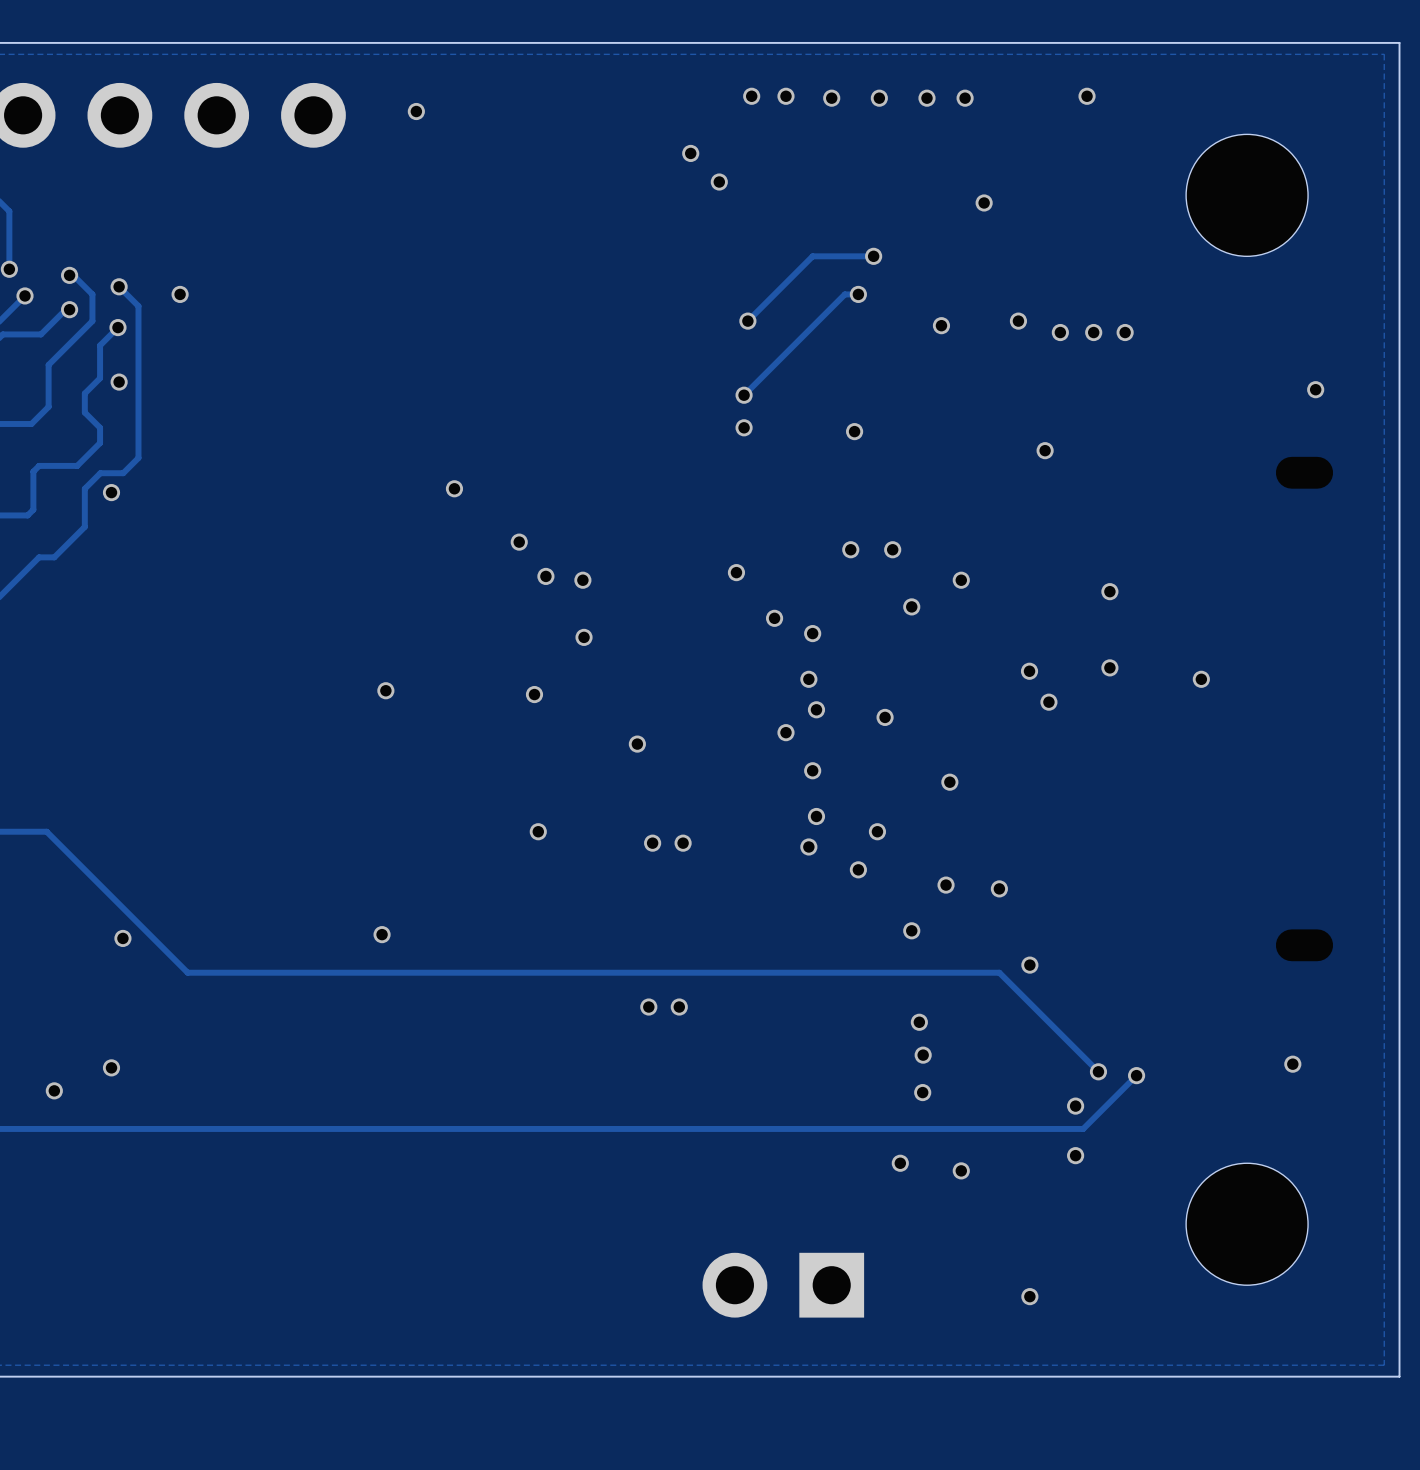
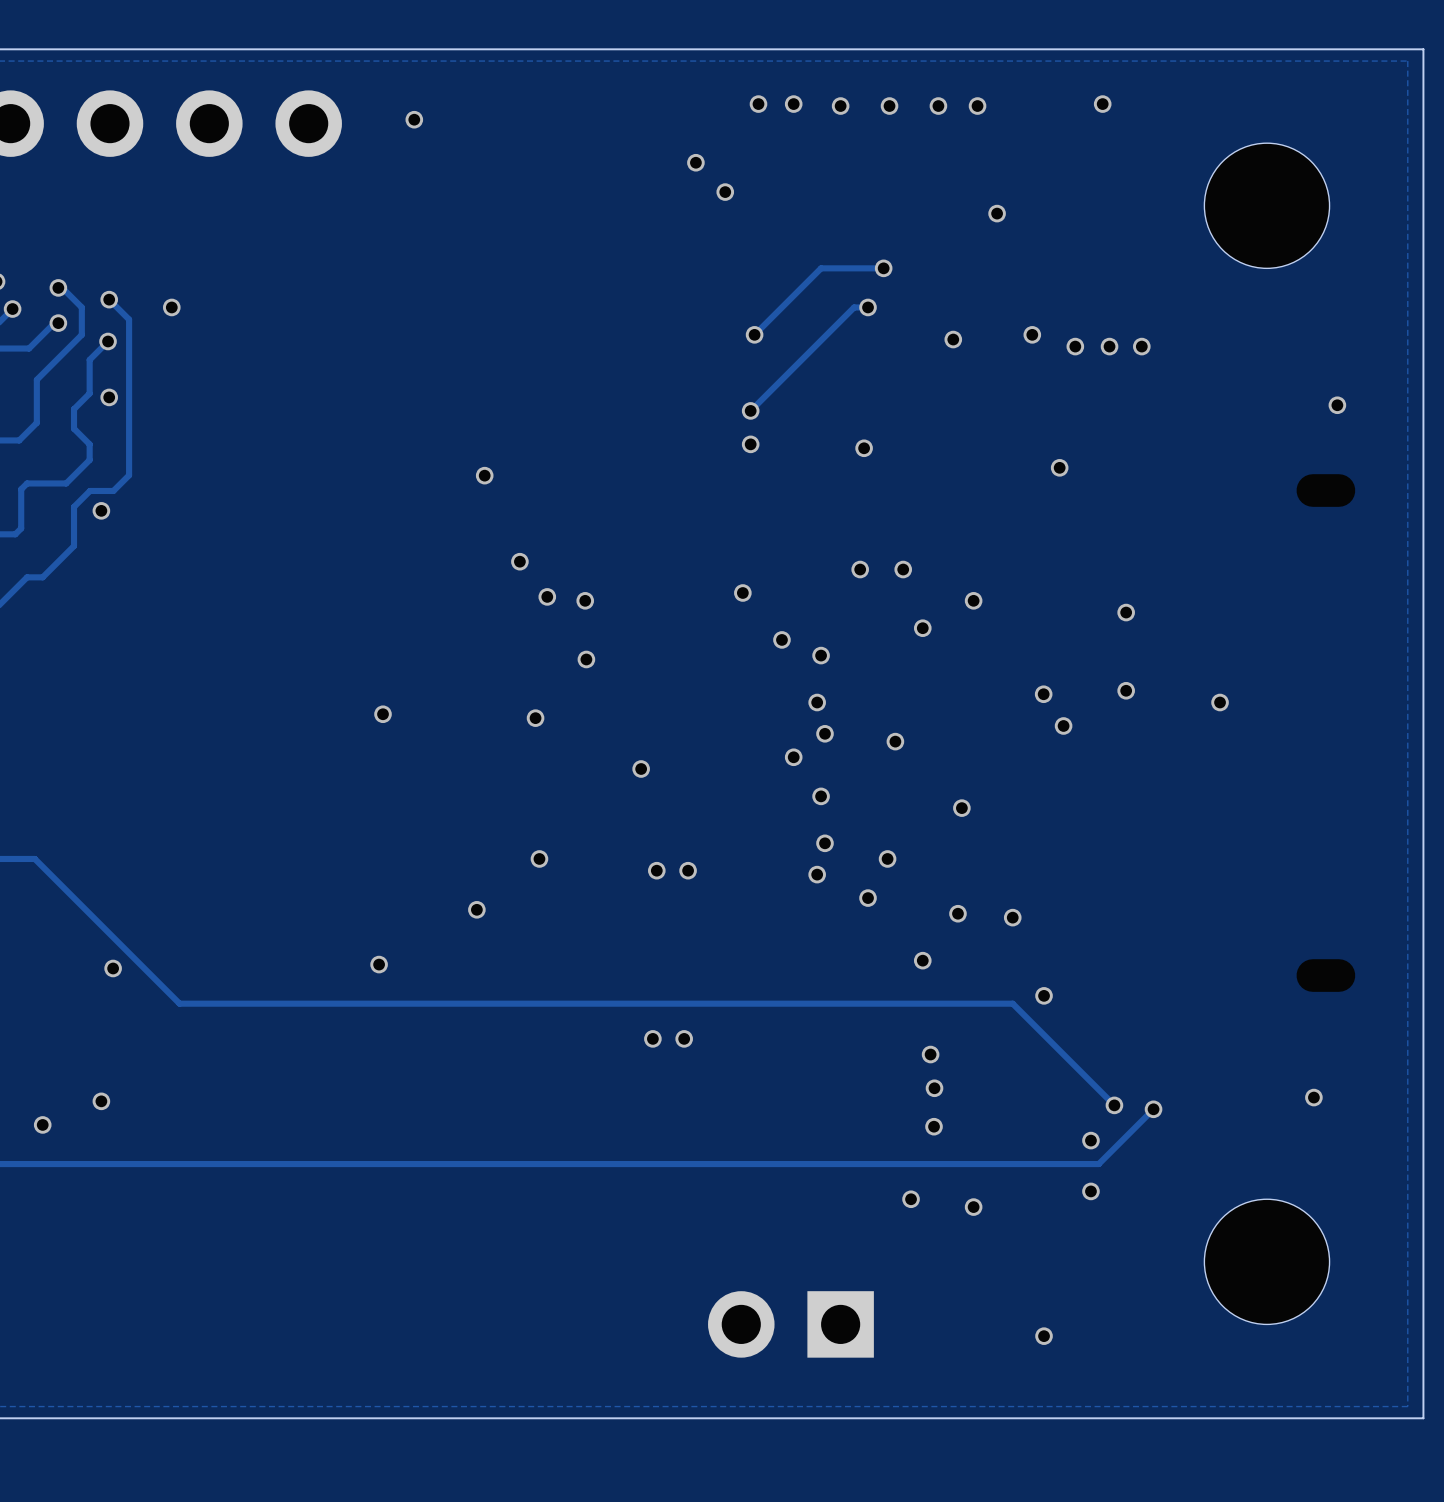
via position: (454, 488) -> (484, 475)
via: none -> (476, 909)

